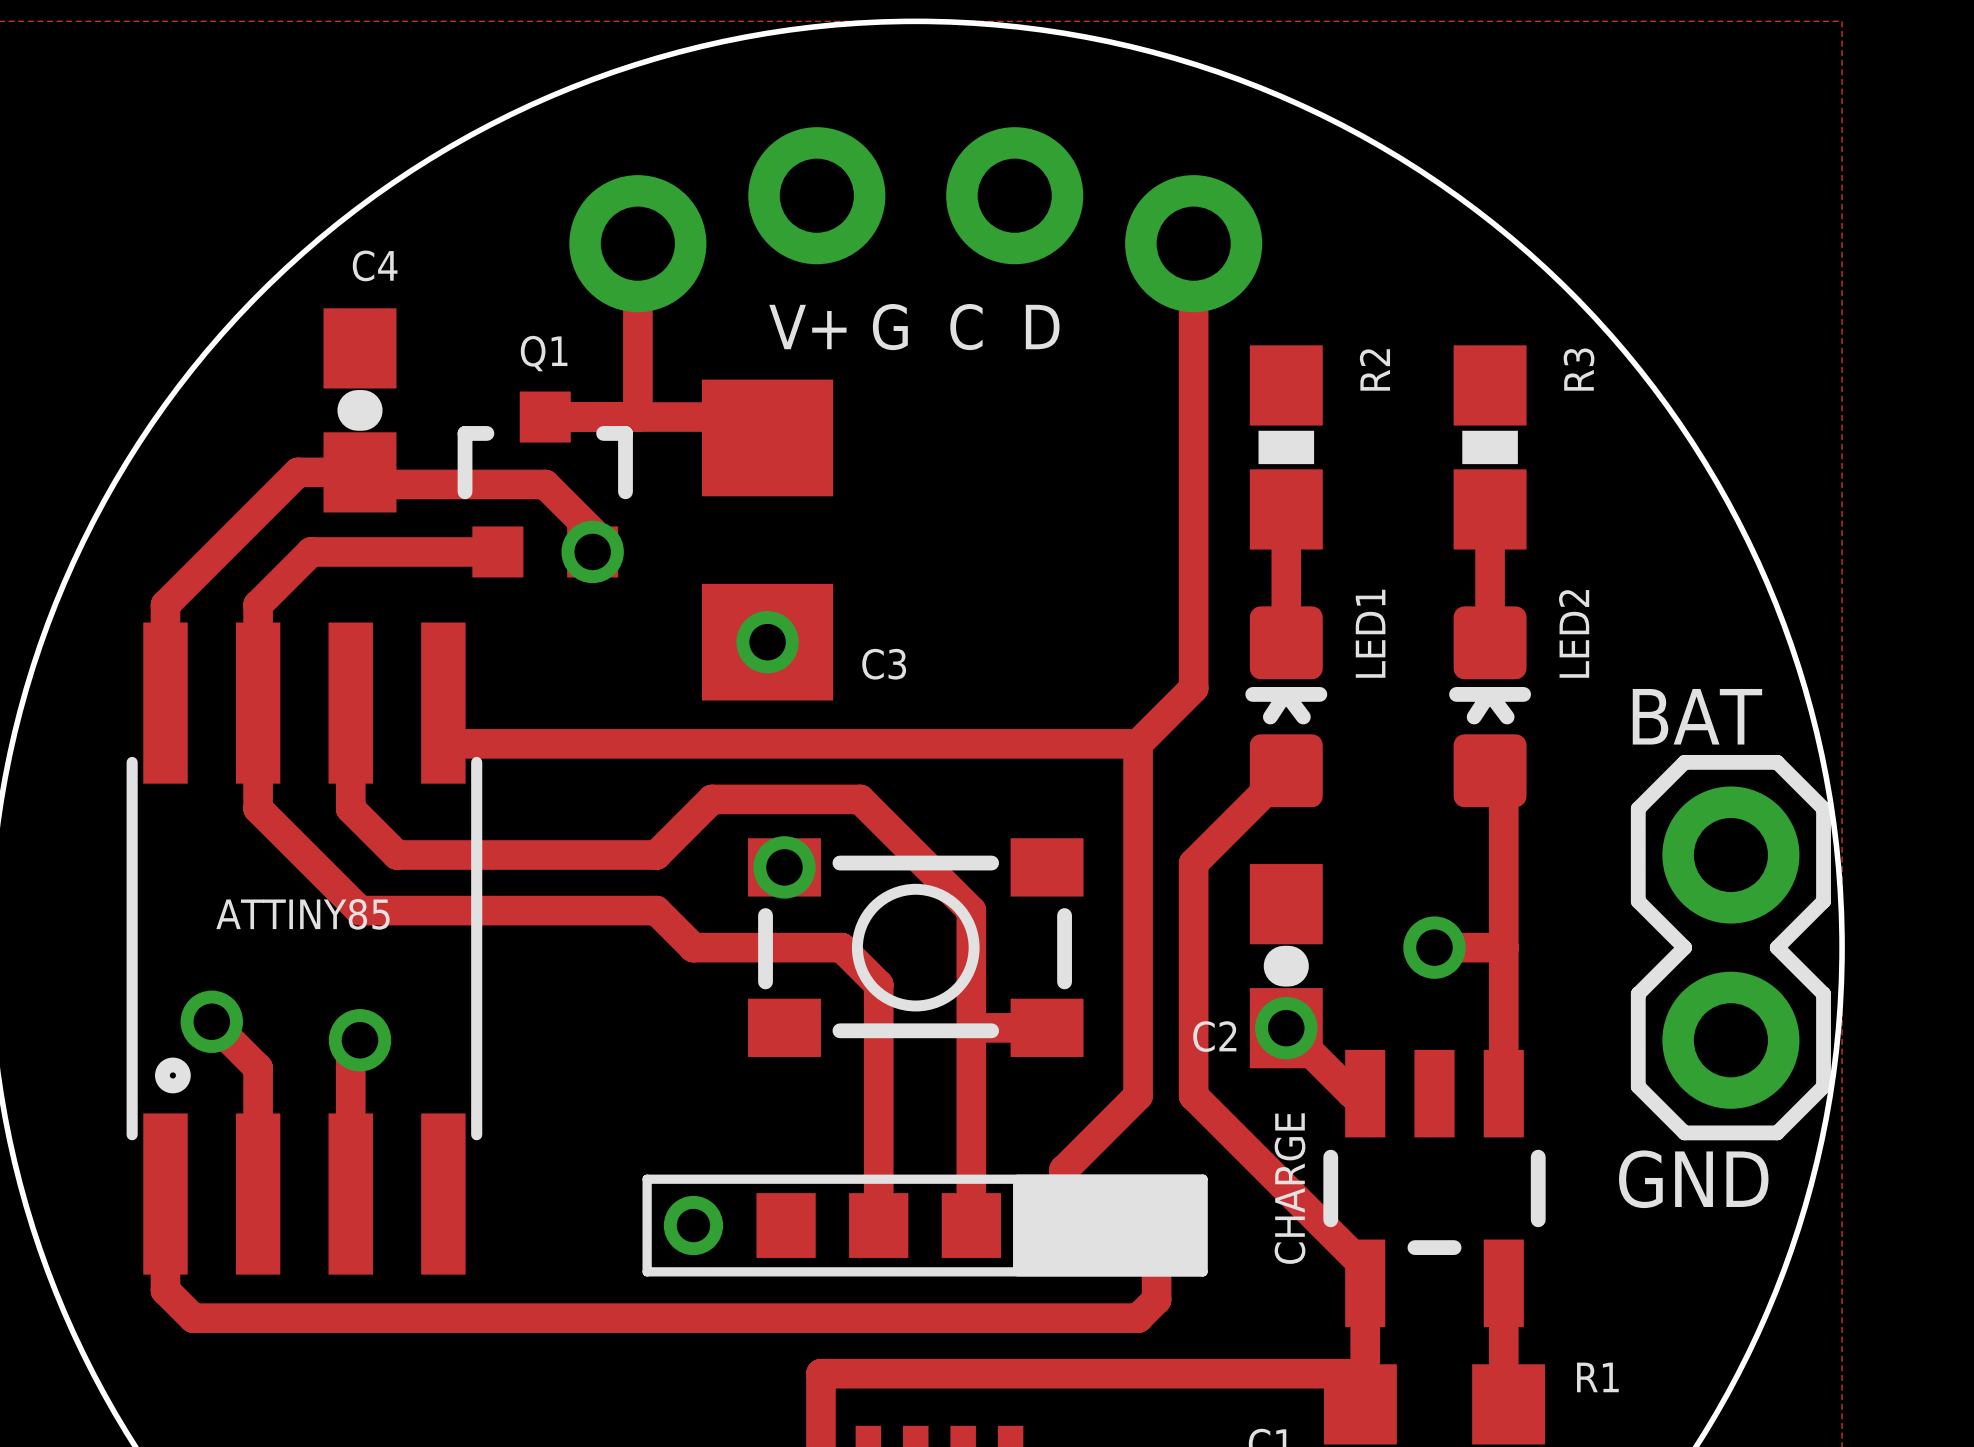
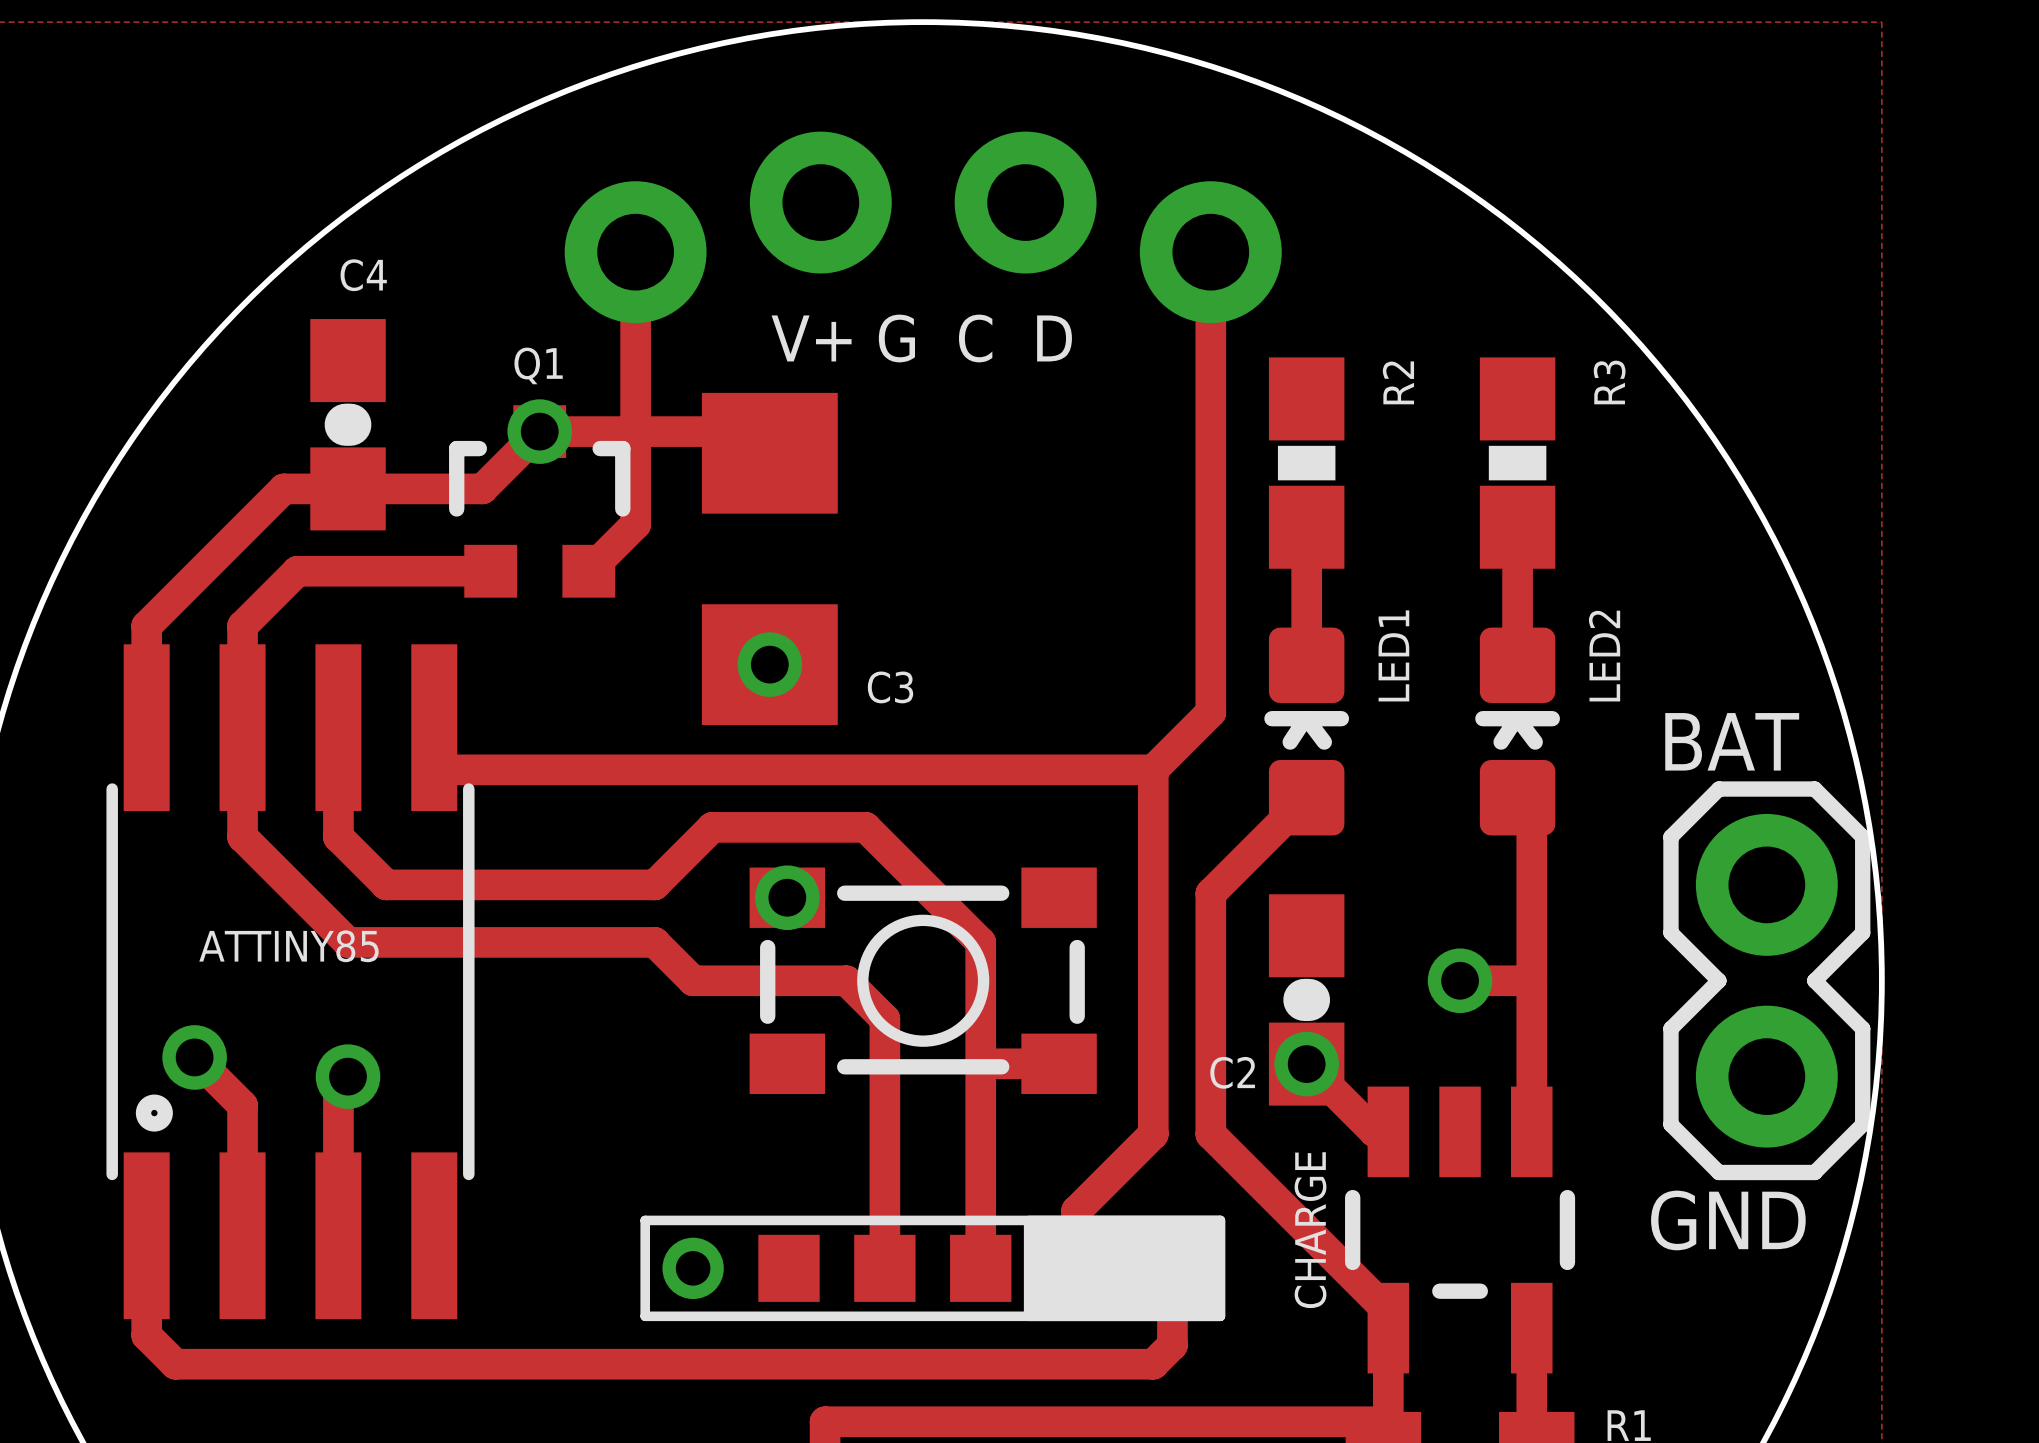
track: none -> (539, 431) (482, 488) (348, 488)
track: (360, 484) (545, 484) (592, 531) (592, 551) -> (635, 431) (635, 524) (588, 571)
via position: (592, 551) -> (539, 431)

